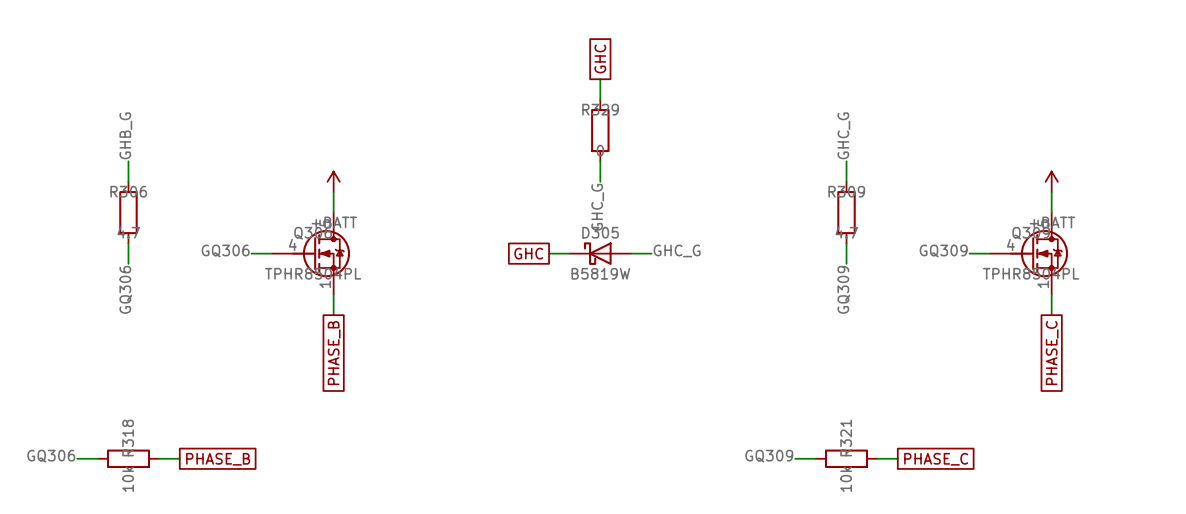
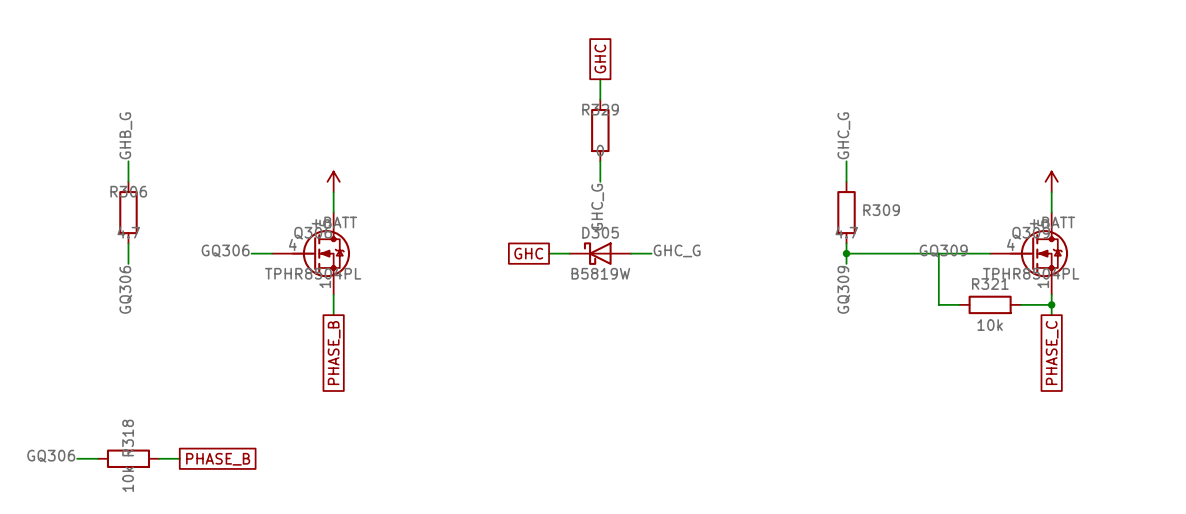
R309 name position: R309 (846, 191) -> R309 (881, 210)
wire: none -> (846, 253) (969, 253)
junction: none -> (846, 253)
wire: none -> (938, 253) (938, 304) (959, 304)
wire: none -> (1020, 304) (1051, 304)
junction: none -> (1051, 304)
R321 name rotation: 0° (846, 438) -> 90° clockwise (990, 284)
label: GQ309 (769, 456) -> none
wire: (795, 458) (815, 458) -> none
R321 position: (846, 458) -> (990, 304)
wire: (877, 458) (897, 458) -> none
global label: PHASE_C (936, 459) -> none
R321 value rotation: 0° (846, 479) -> 90° clockwise (990, 325)

